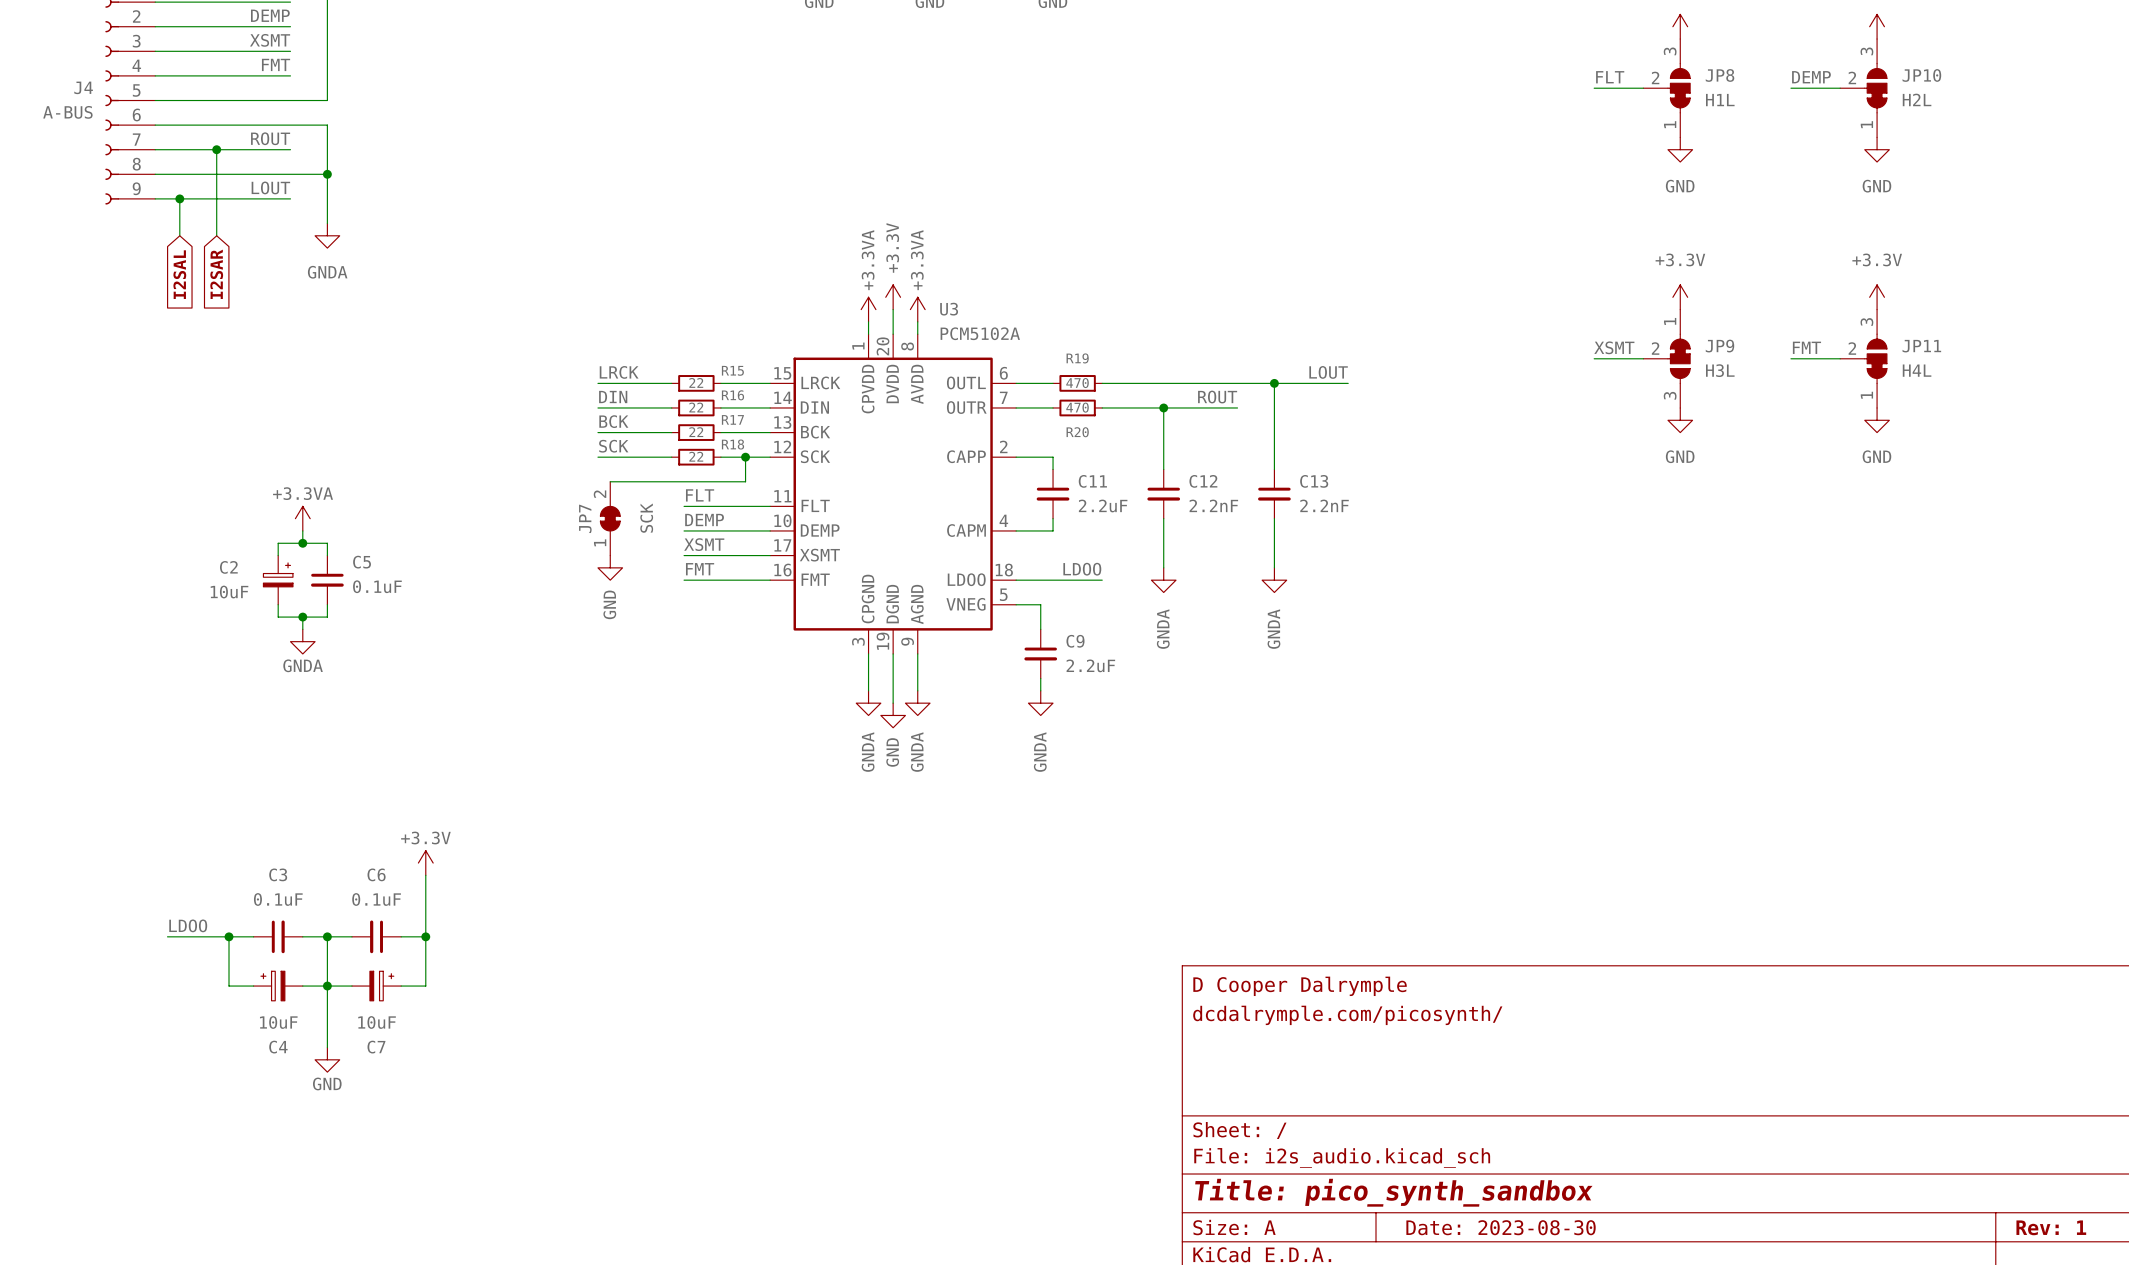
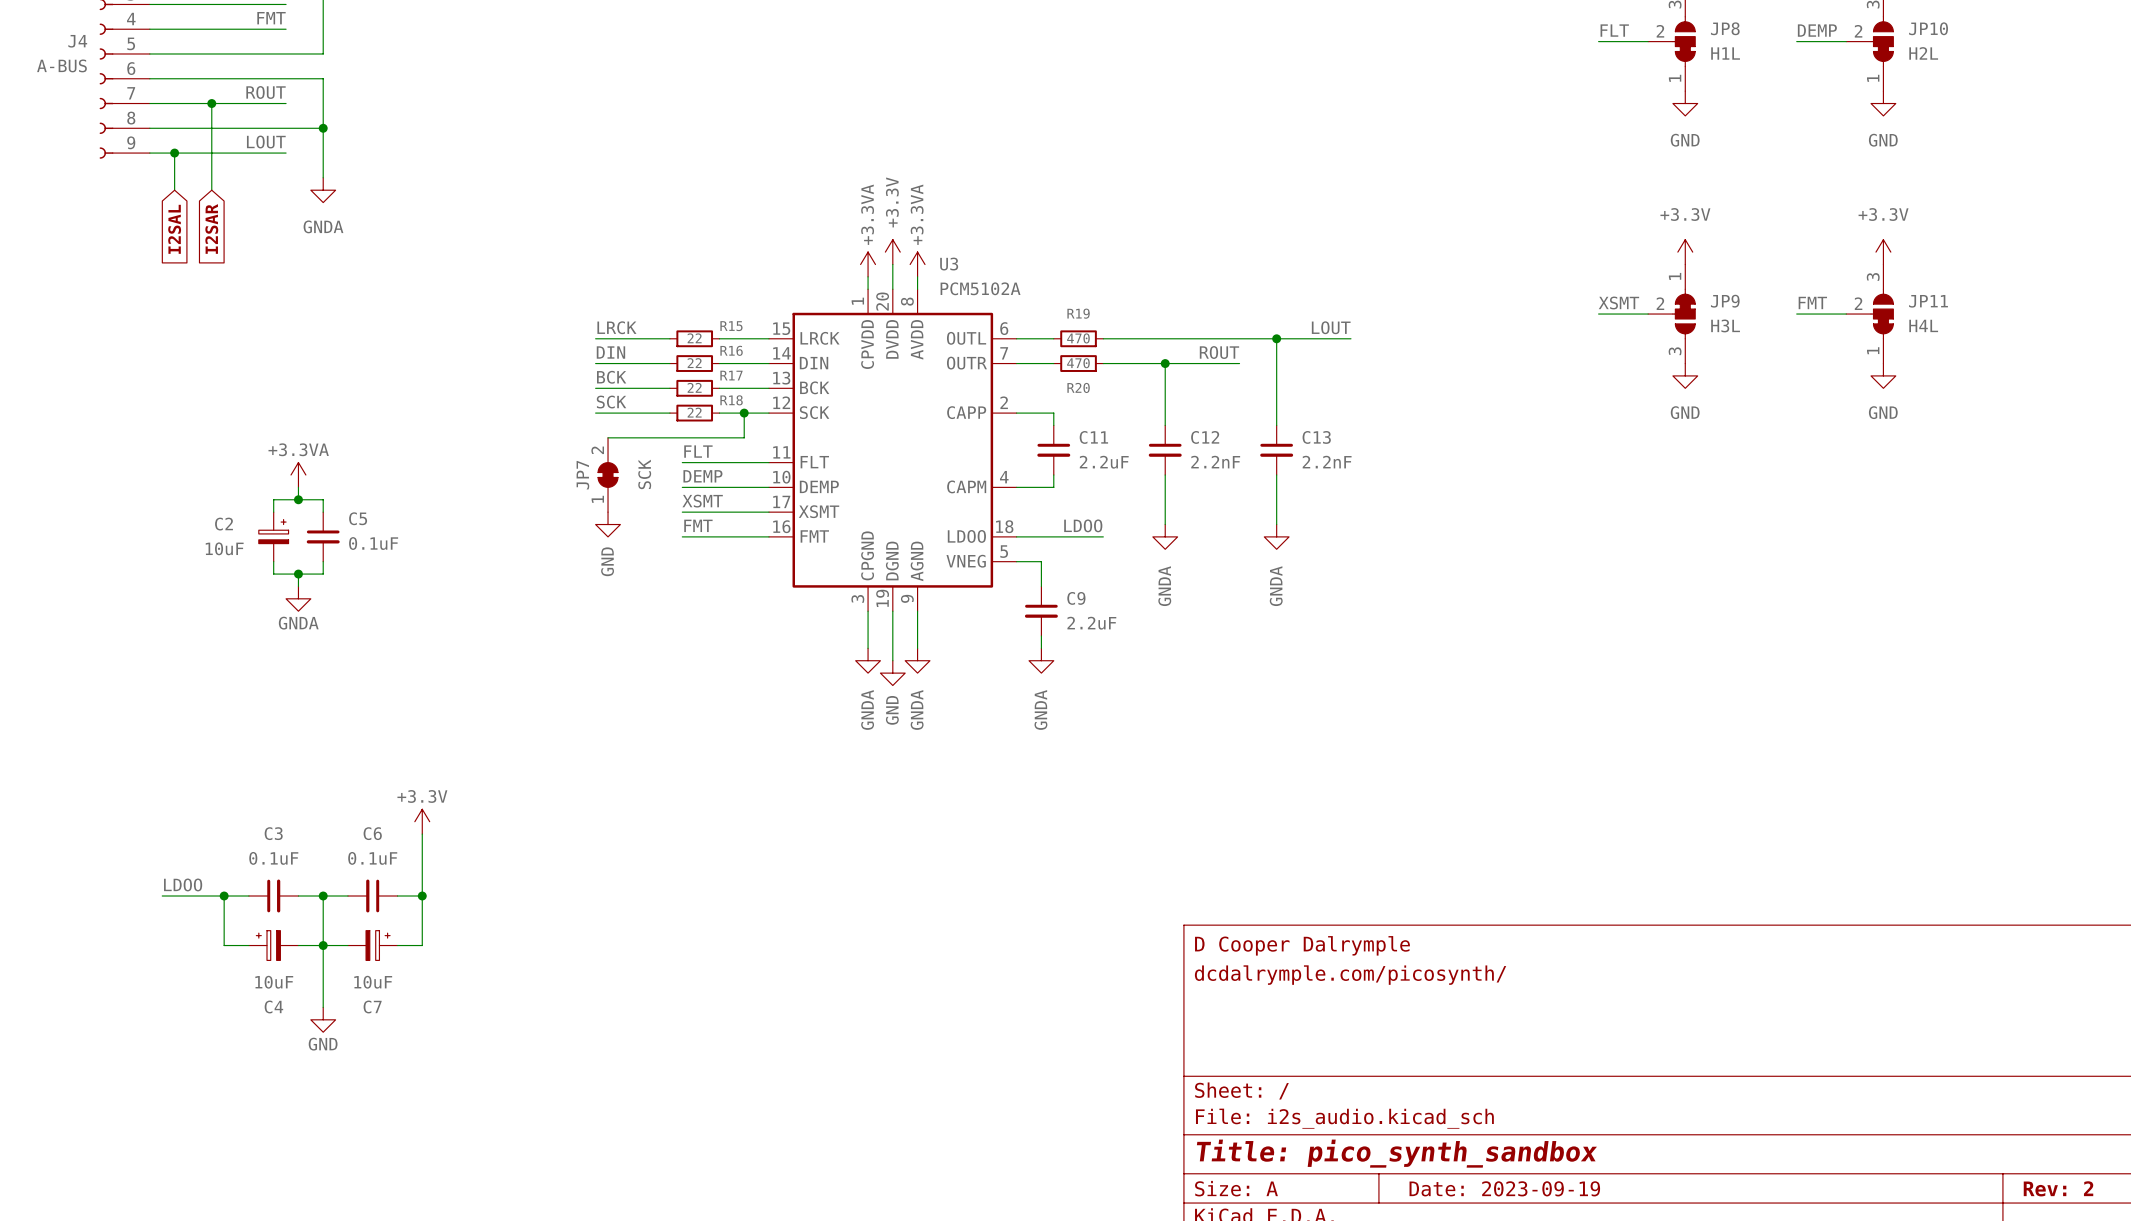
title block: Date: 2023-08-30 (1501, 1227) -> Date: 2023-09-19 (1504, 1188)
title block: Rev: 1 (2051, 1227) -> Rev: 2 (2058, 1188)

